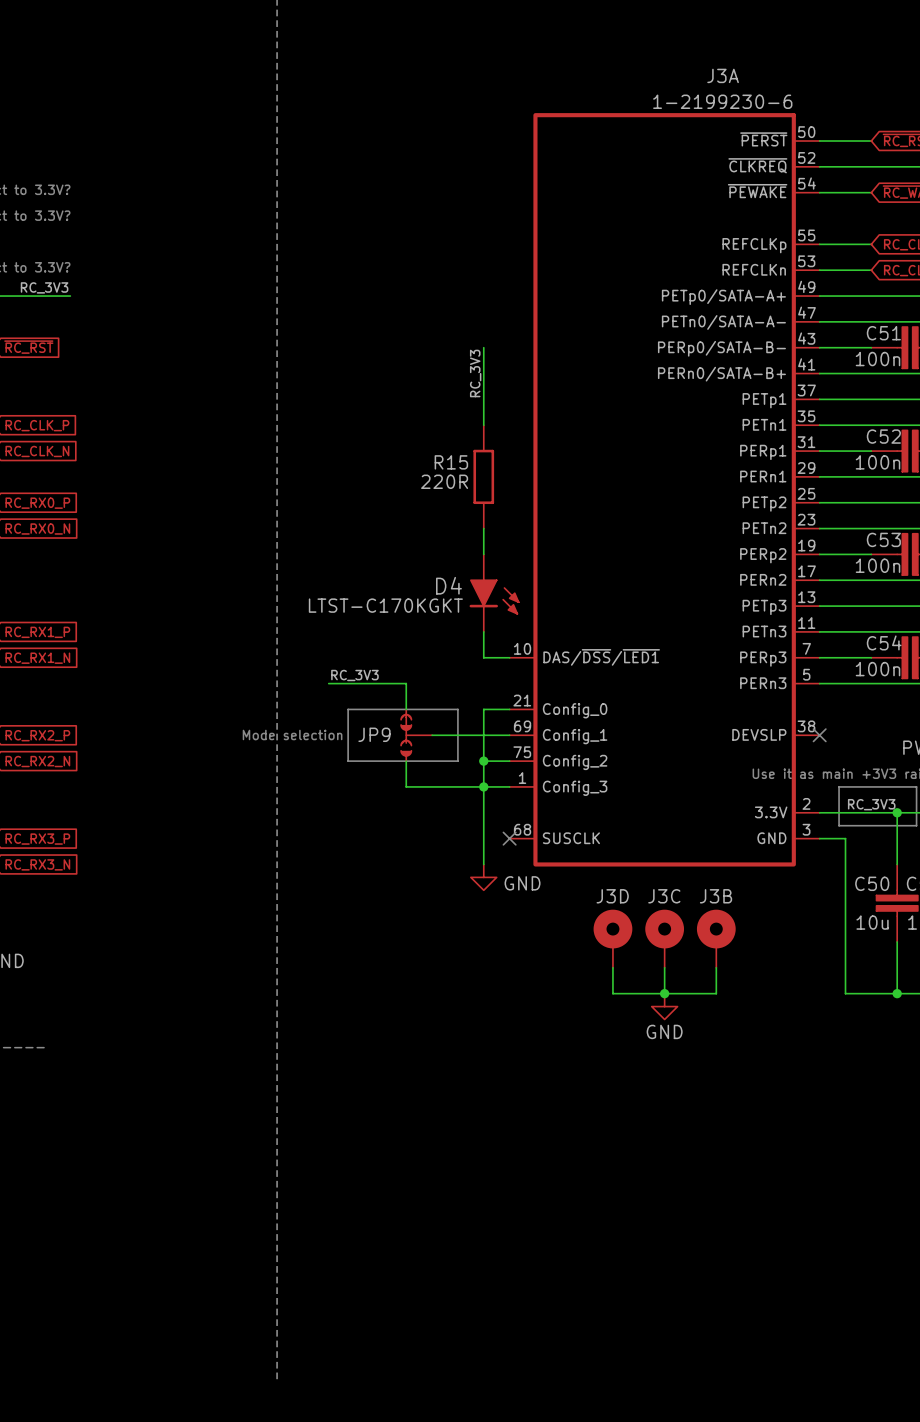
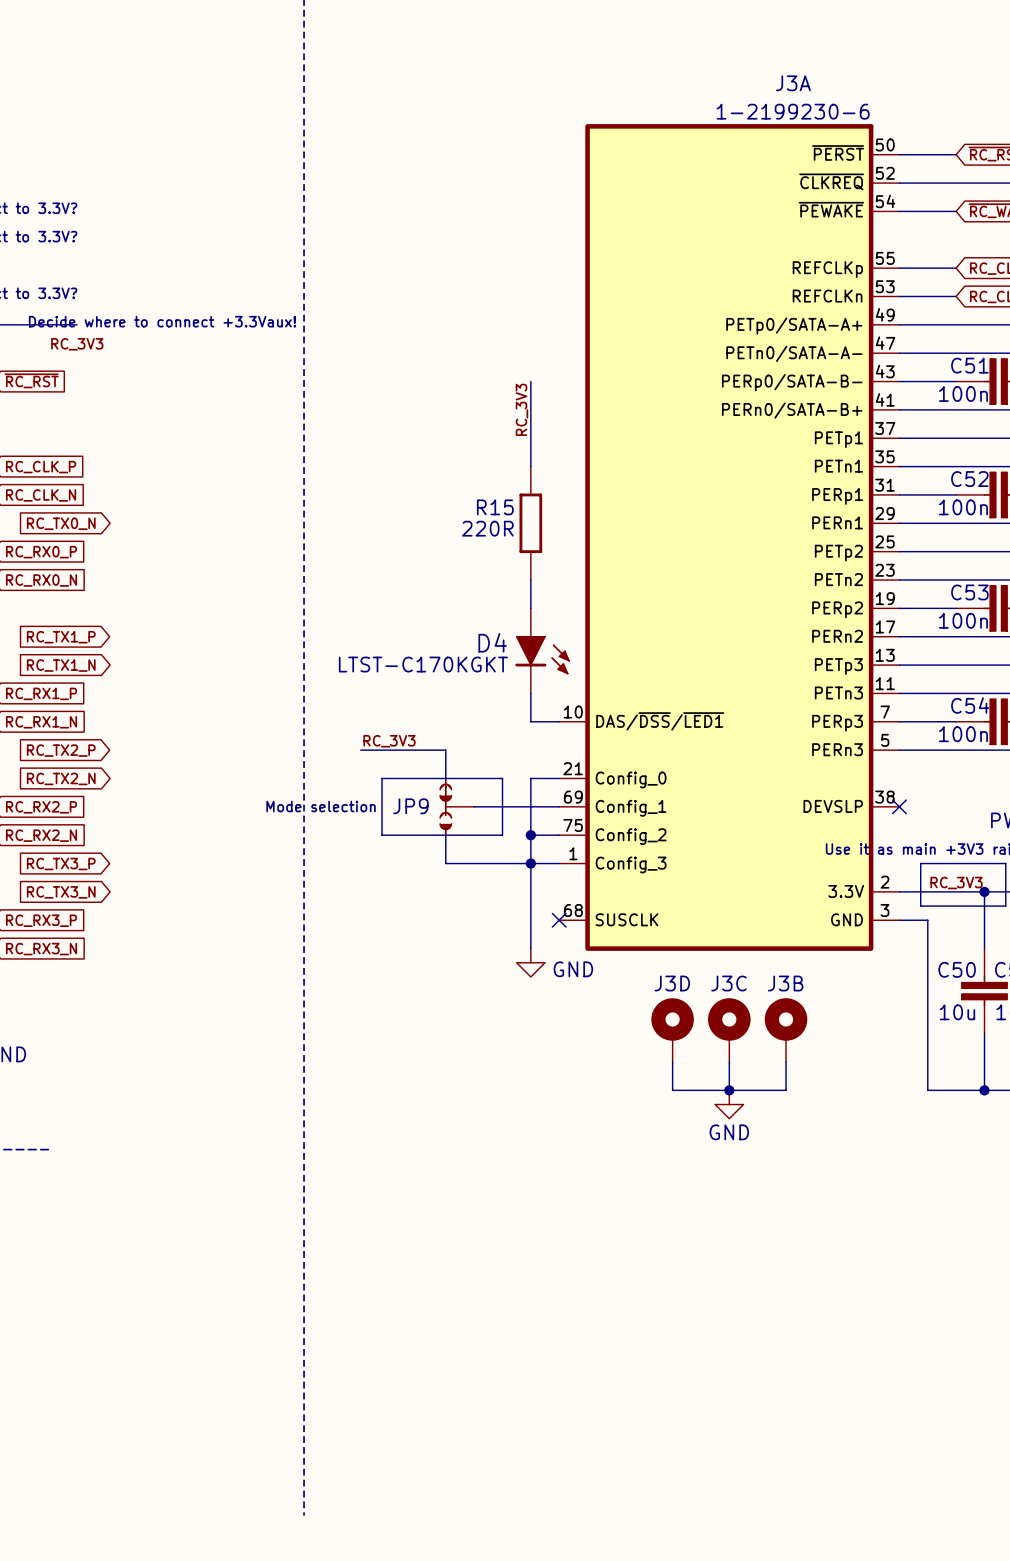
label position: RC_3V3 (44, 287) -> RC_3V3 (77, 344)
text: none -> Decide where to connect +3.3Vaux! (162, 321)
global label: none -> RC_TX0_N (61, 523)
global label: none -> RC_TX1_P (61, 637)
global label: none -> RC_TX1_N (61, 665)
global label: none -> RC_TX2_P (61, 750)
global label: none -> RC_TX2_N (61, 778)
global label: none -> RC_TX3_P (61, 864)
global label: none -> RC_TX3_N (61, 892)

